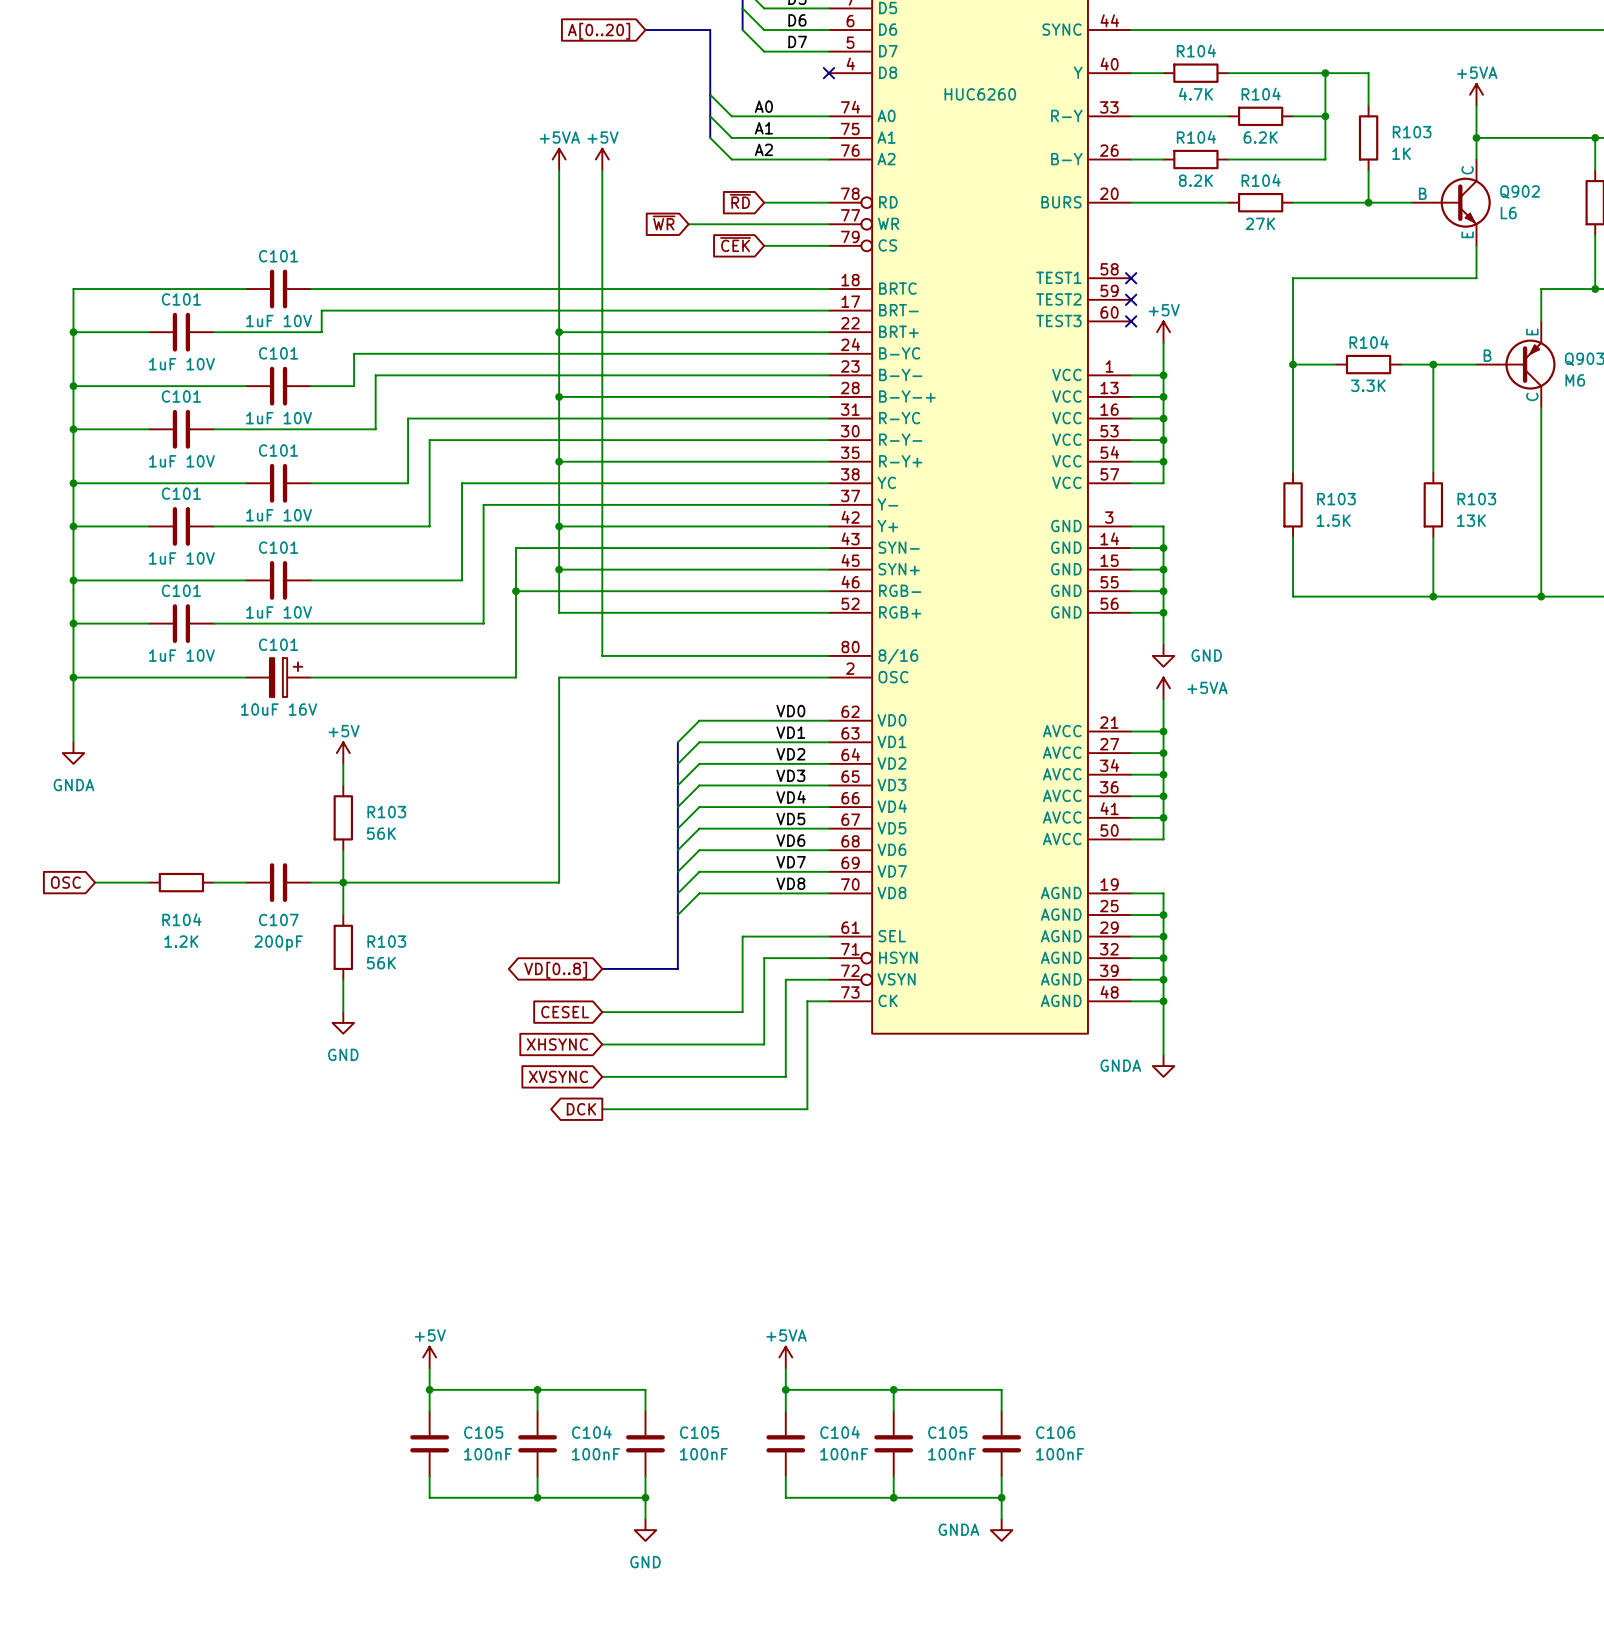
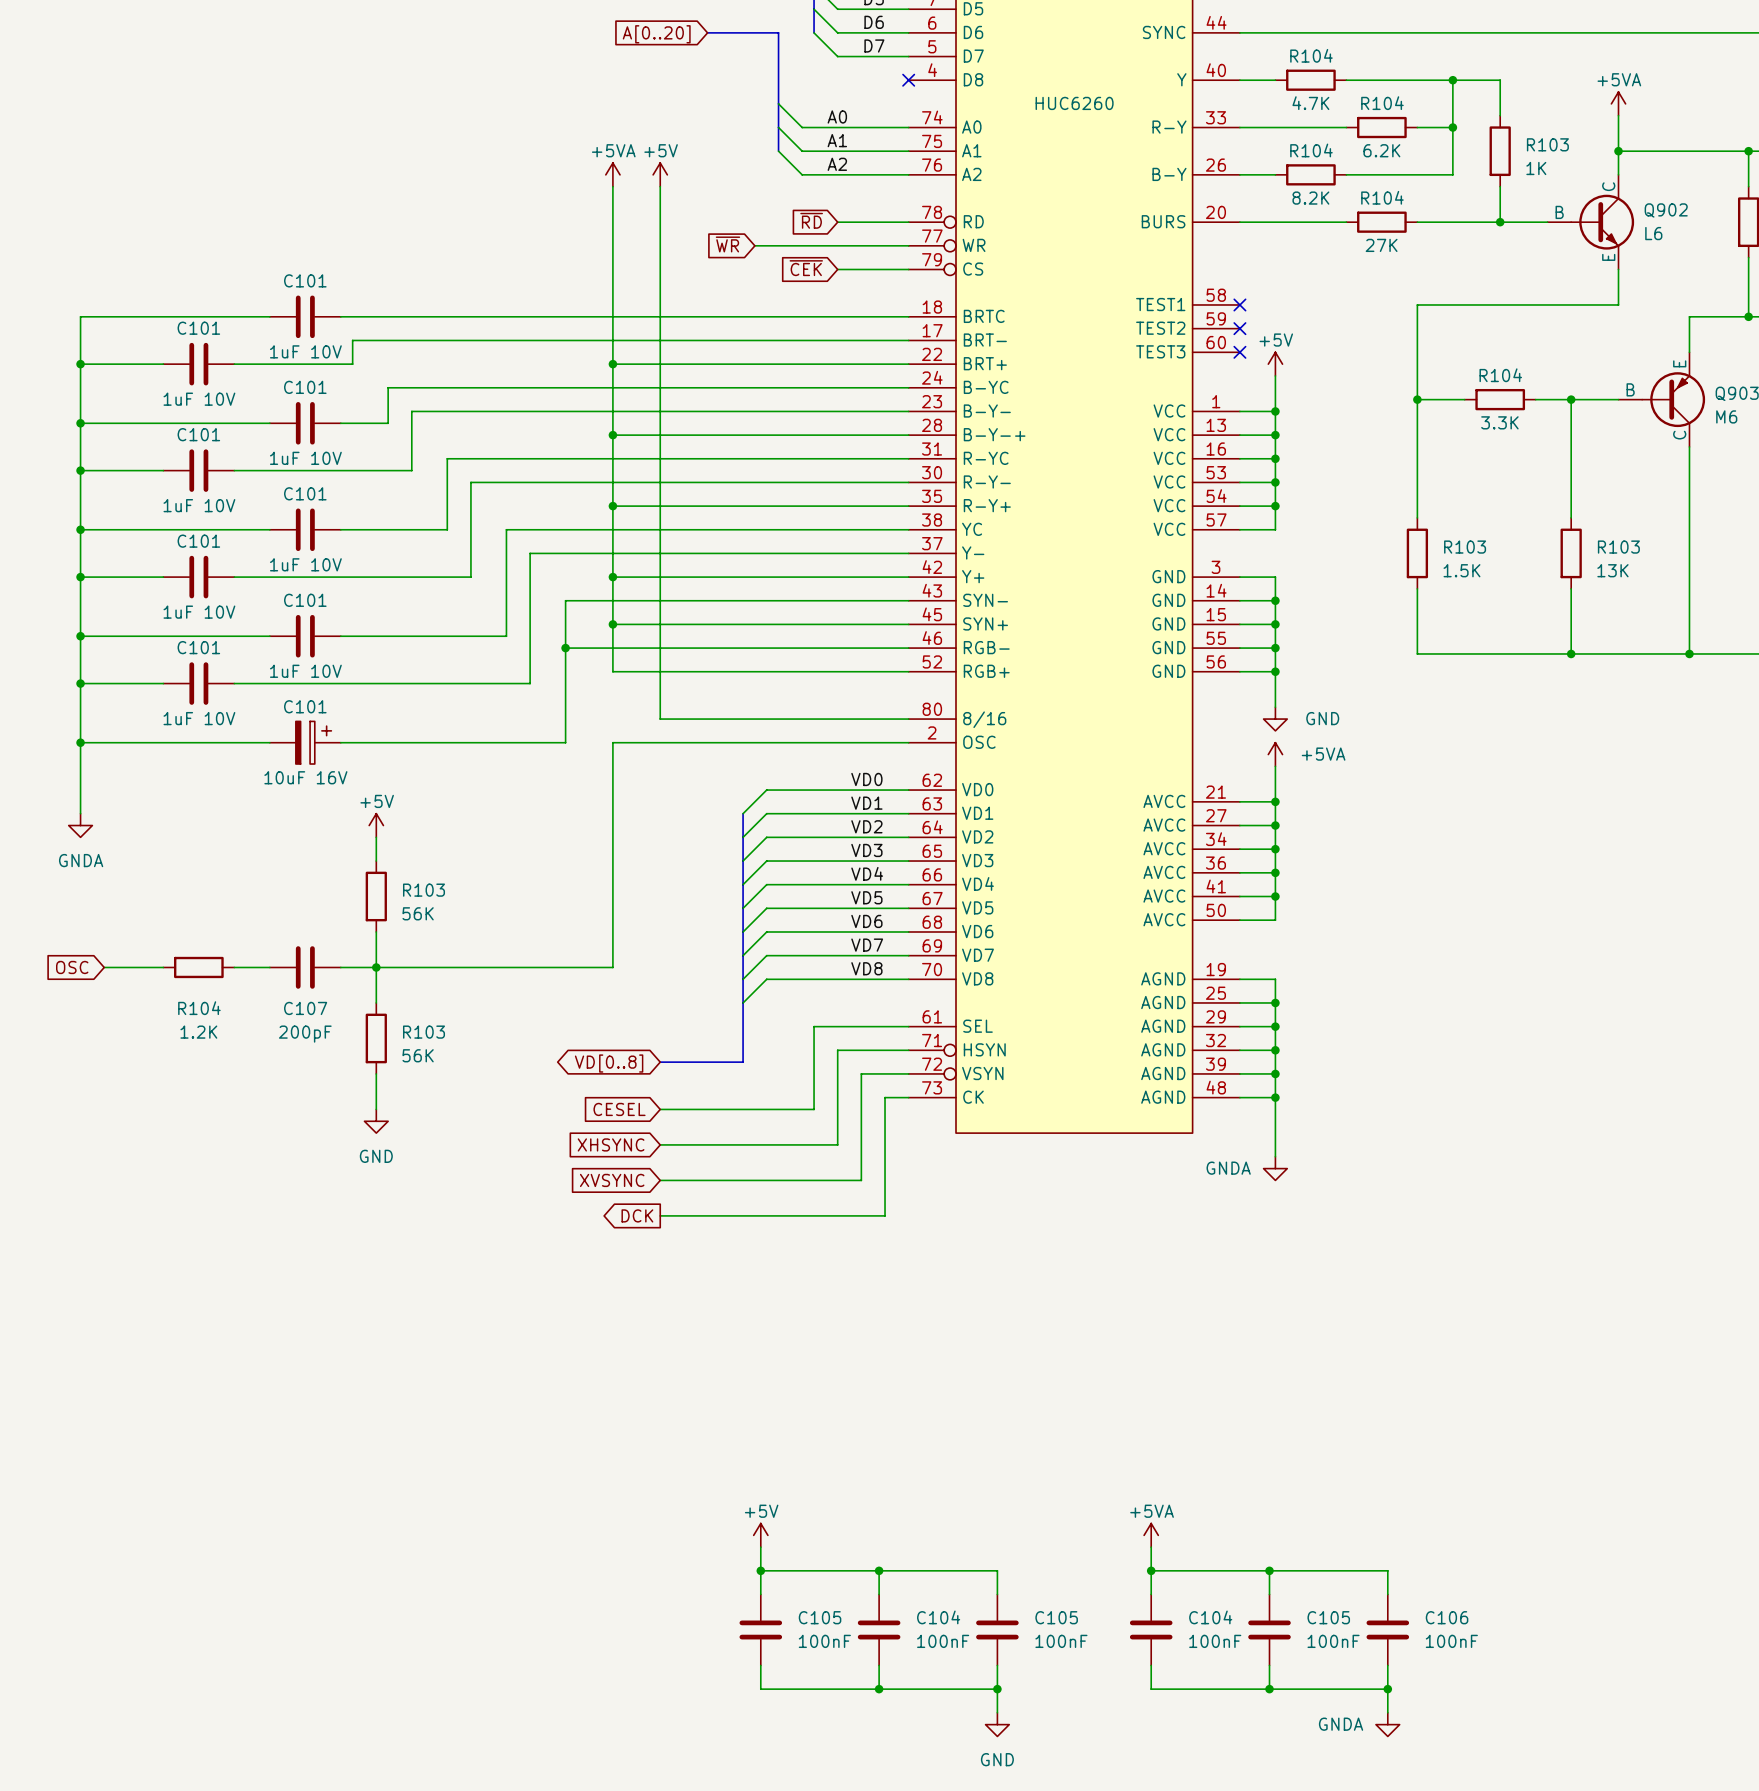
power symbol: +5V (429, 1357) -> none
power symbol: +5VA (785, 1357) -> none
wire: (429, 1368) (429, 1411) -> none
wire: (785, 1368) (785, 1411) -> (760, 1547) (760, 1594)
wire: (429, 1389) (645, 1389) (645, 1411) -> none
junction: (429, 1389) -> none
wire: (537, 1389) (537, 1411) -> none
junction: (537, 1389) -> none
wire: (785, 1389) (1001, 1389) (1001, 1411) -> (760, 1570) (997, 1570) (997, 1594)
junction position: (785, 1389) -> (879, 1570)
wire: (893, 1389) (893, 1411) -> (879, 1570) (879, 1594)
junction: (893, 1389) -> none
power symbol: none -> +5V (760, 1535)
power symbol: none -> +5VA (1151, 1535)
wire: none -> (1151, 1547) (1151, 1594)
junction: none -> (760, 1570)
wire: none -> (1151, 1570) (1387, 1570) (1387, 1594)
junction: none -> (1151, 1570)
wire: none -> (1269, 1570) (1269, 1594)
junction: none -> (1269, 1570)
C105: 100nF (429, 1443) -> none
C104: 100nF (537, 1443) -> none
C105 position: (645, 1443) -> (760, 1629)
C104 position: (785, 1443) -> (879, 1629)
C105 position: (893, 1443) -> (997, 1629)
C106 position: (1001, 1443) -> (1387, 1629)
wire: (429, 1476) (429, 1497) (645, 1497) -> none
wire: (537, 1476) (537, 1497) -> none
wire: (645, 1476) (645, 1519) -> none
wire: (785, 1476) (785, 1497) (1001, 1497) -> (760, 1665) (760, 1689) (997, 1689)
wire: (893, 1476) (893, 1497) -> (879, 1665) (879, 1689)
wire: (1001, 1476) (1001, 1519) -> (997, 1665) (997, 1712)
C104: none -> 100nF (1151, 1629)
C105: none -> 100nF (1269, 1629)
junction: (537, 1497) -> none
junction: (645, 1497) -> none
junction position: (893, 1497) -> (997, 1689)
junction: (1001, 1497) -> none
wire: none -> (1151, 1665) (1151, 1689) (1387, 1689)
wire: none -> (1269, 1665) (1269, 1689)
wire: none -> (1387, 1665) (1387, 1712)
power symbol: GND (645, 1530) -> none
power symbol: GNDA (1001, 1530) -> none
junction: none -> (879, 1689)
junction: none -> (1269, 1689)
junction: none -> (1387, 1689)
power symbol: none -> GND (997, 1724)
power symbol: none -> GNDA (1387, 1724)

